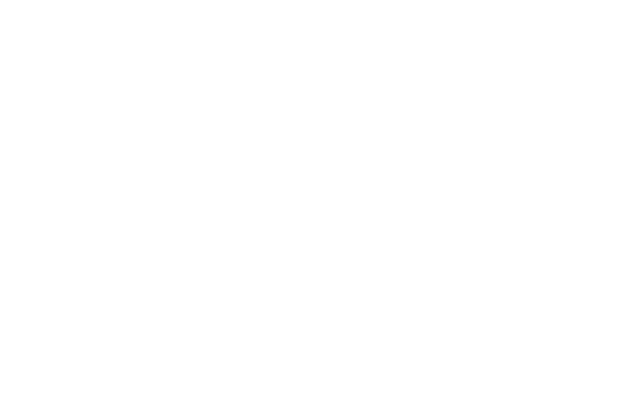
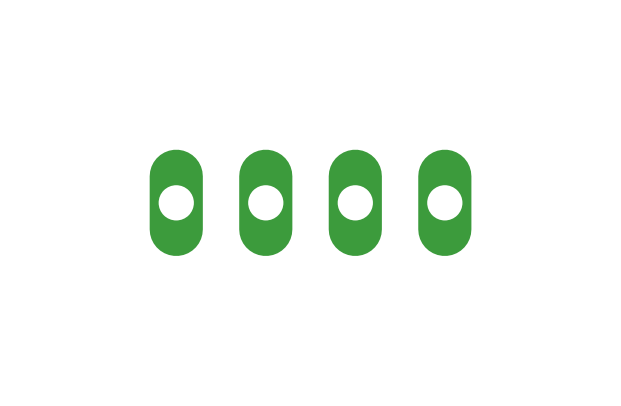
part: none -> (310, 202)

